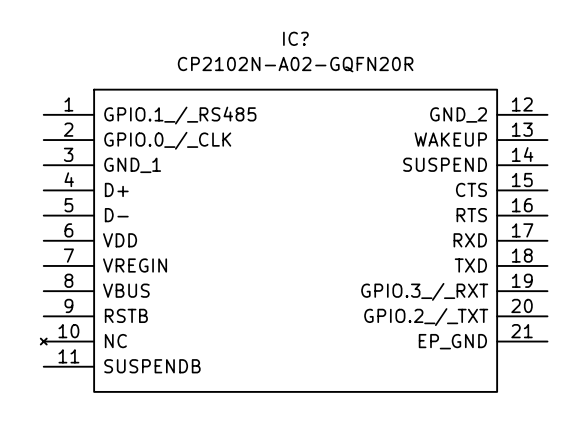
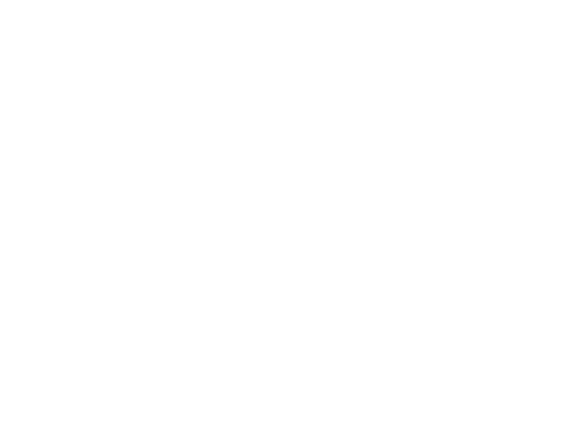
IC?: CP2102N-A02-GQFN20R (294, 240) -> none

